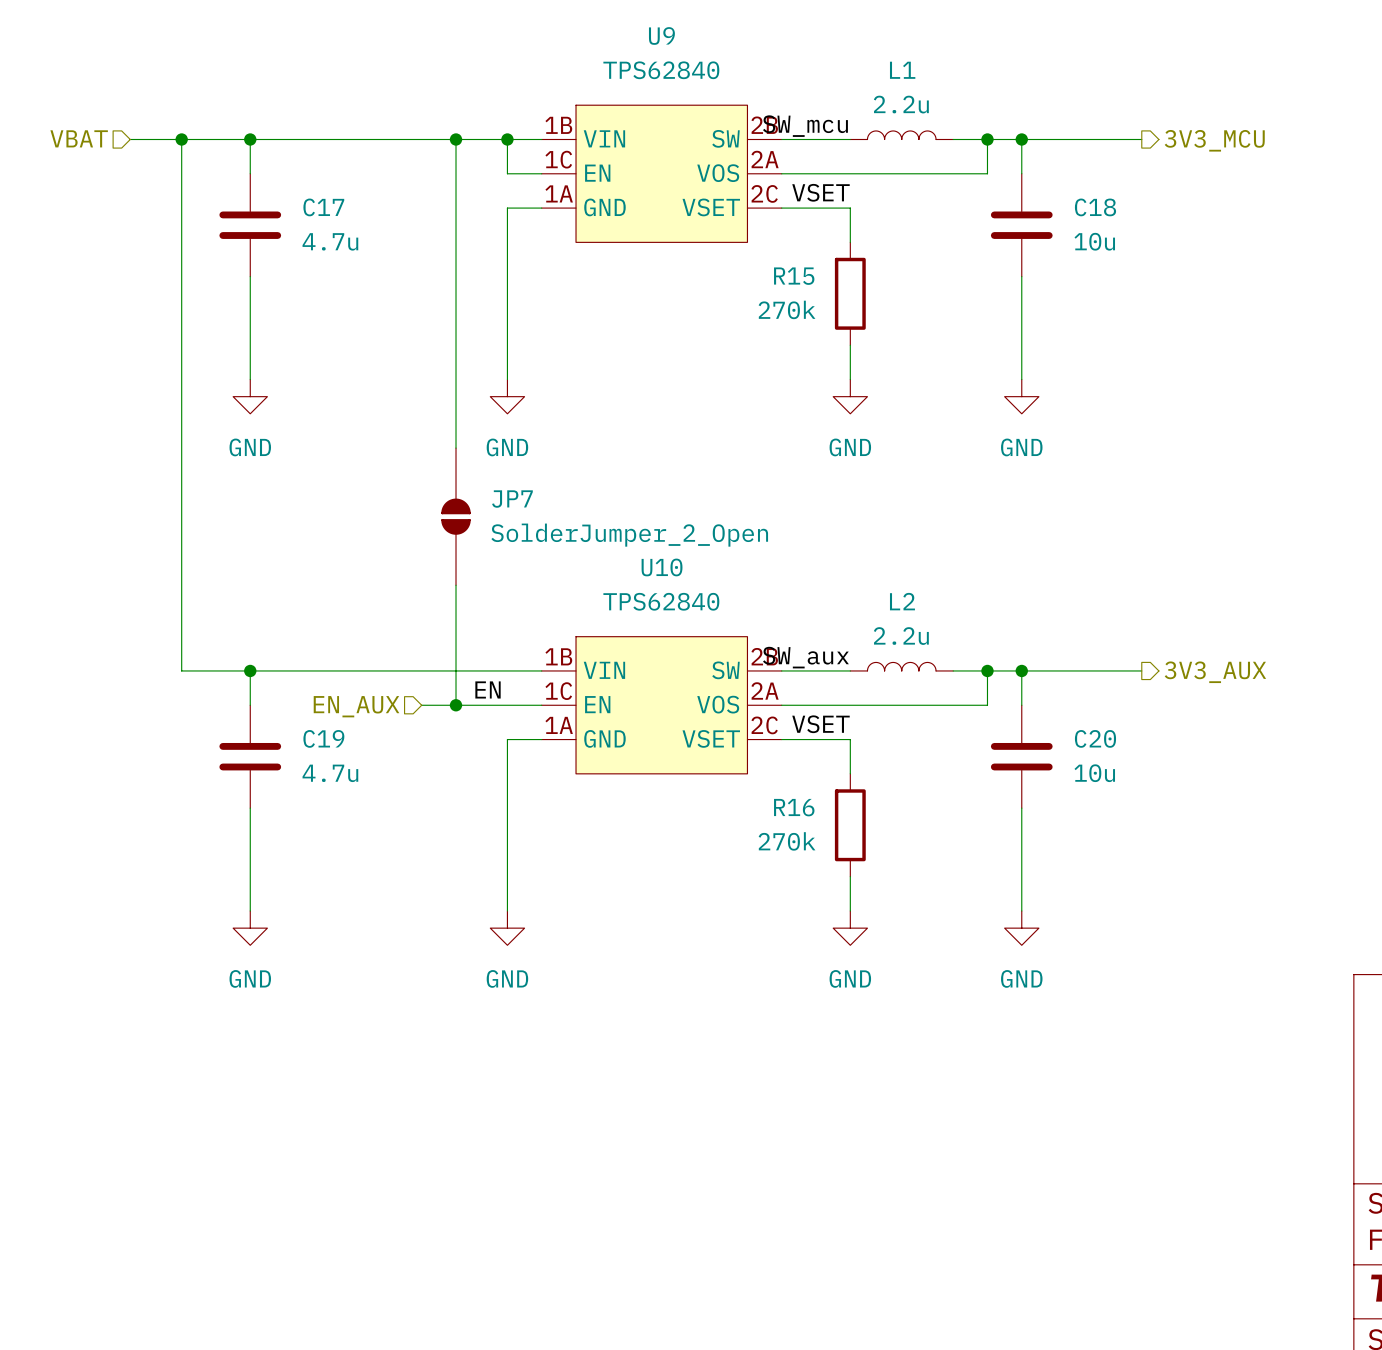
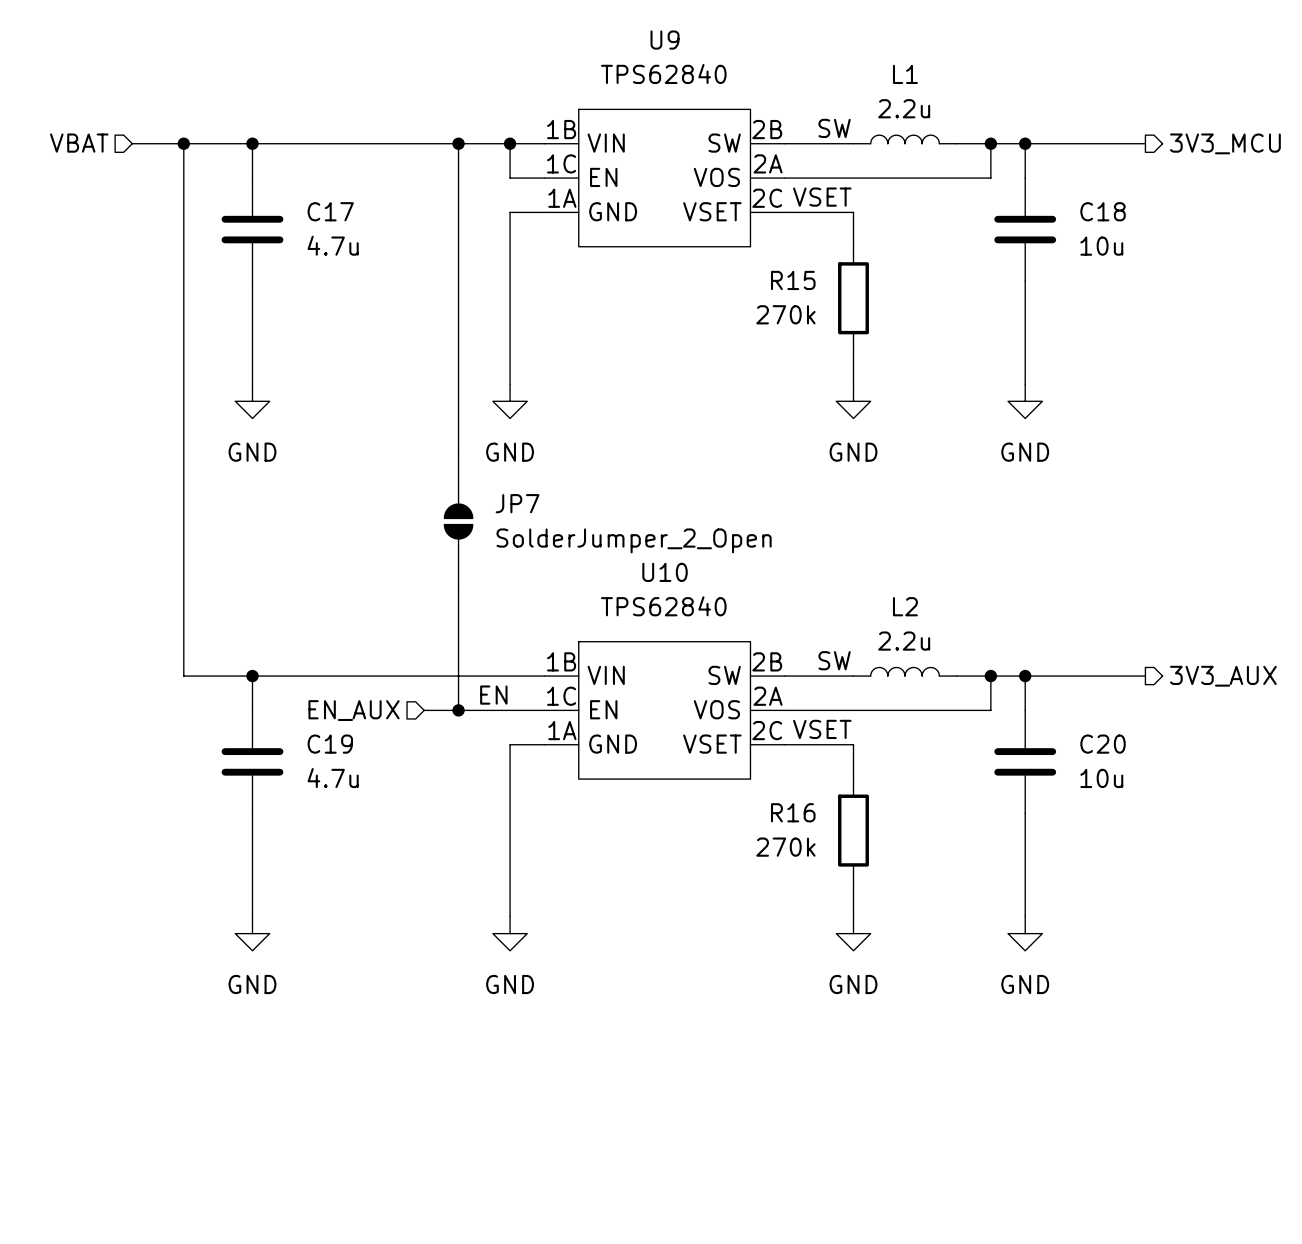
label: SW_mcu (805, 126) -> SW (834, 128)
label: SW_aux (805, 657) -> SW (834, 660)

